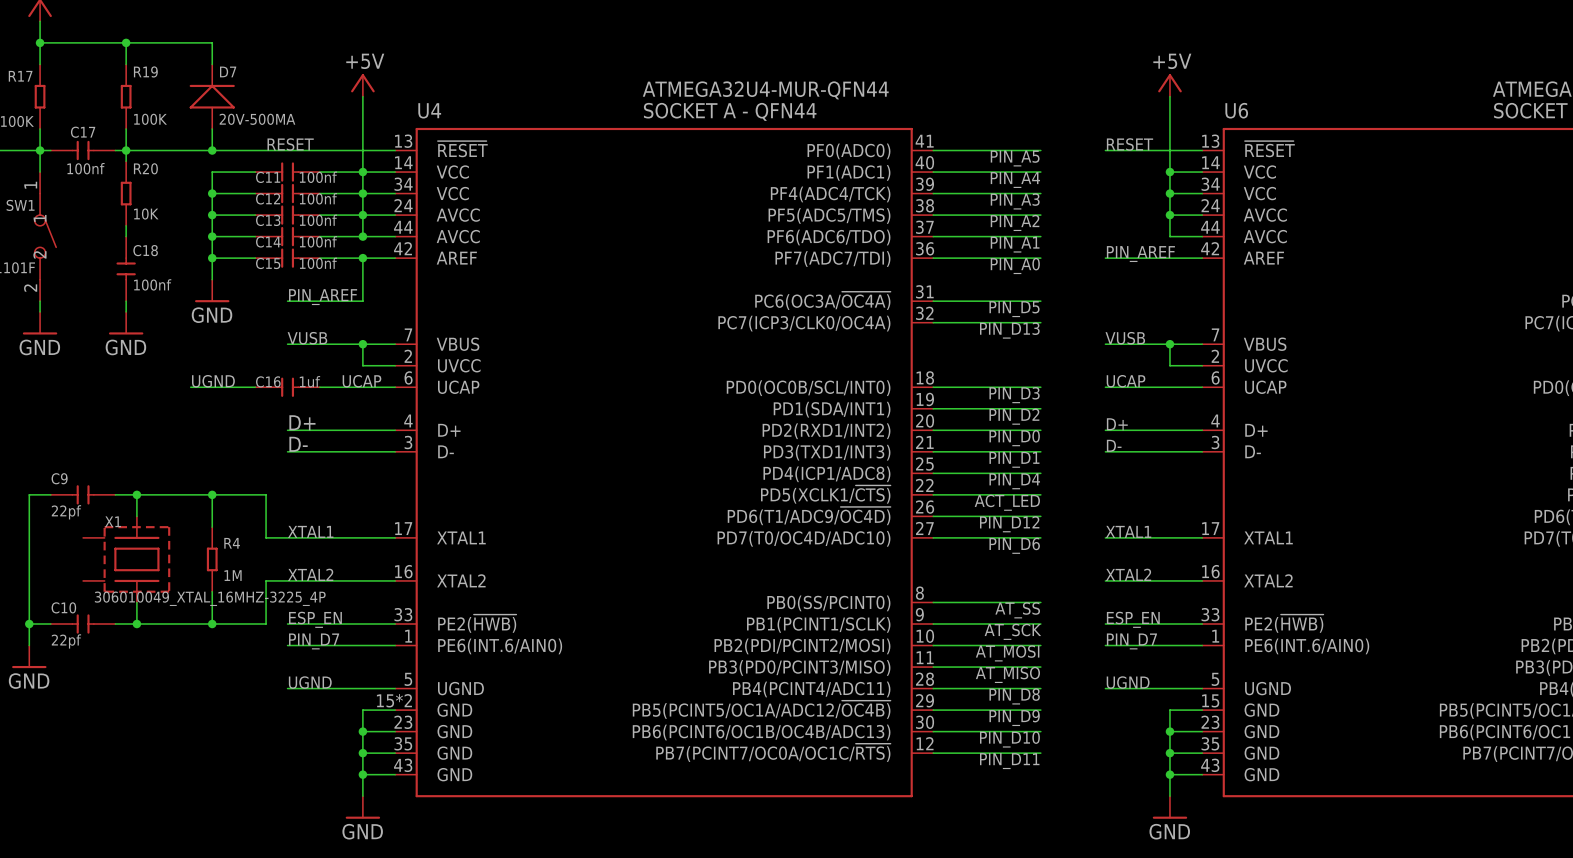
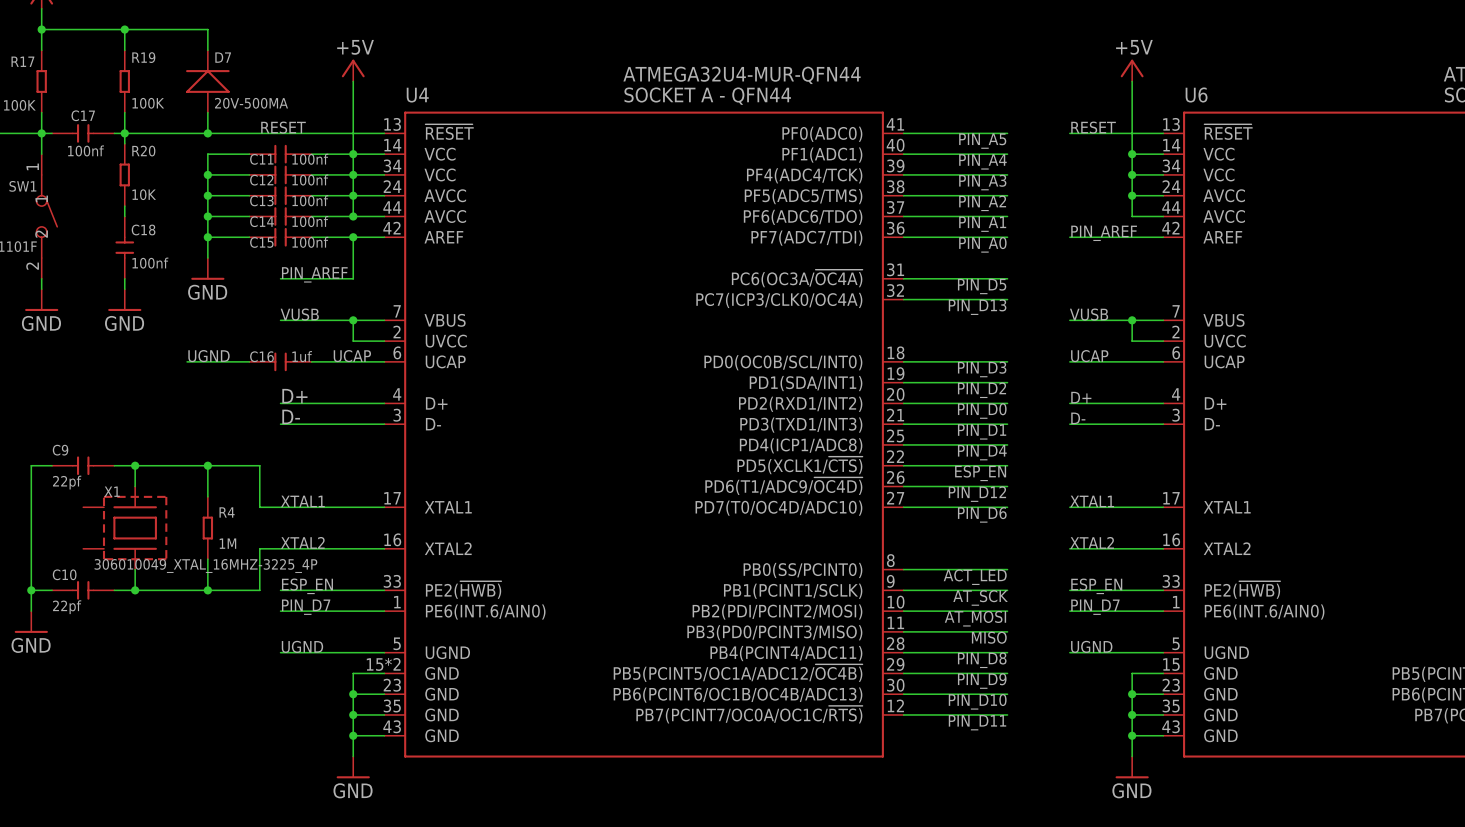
label: ACT_LED (1007, 502) -> ESP_EN (980, 473)
label: AT_SS (1017, 610) -> ACT_LED (975, 577)
label: AT_MISO (1007, 674) -> MISO (989, 637)

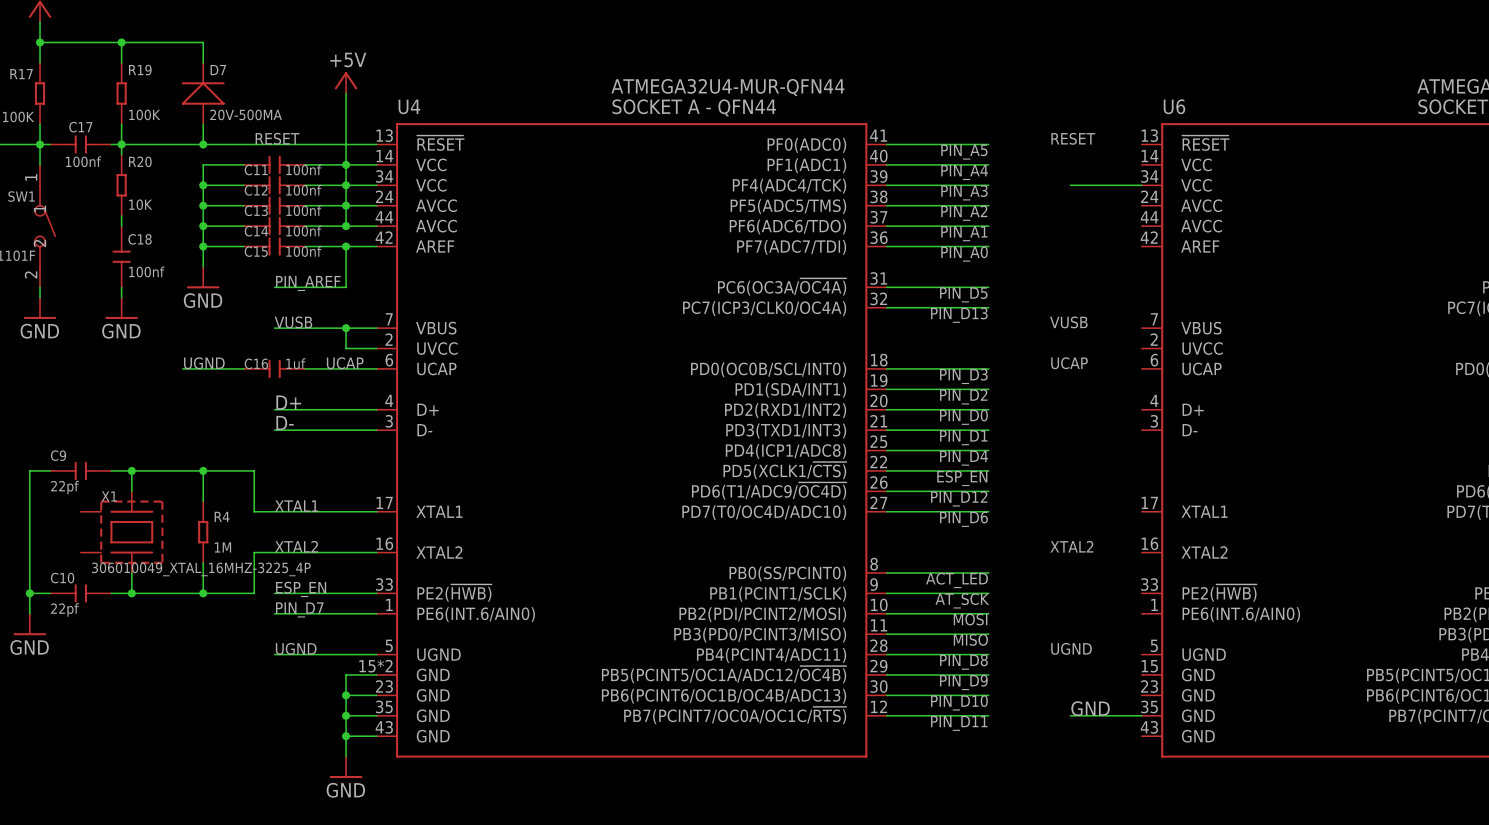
power symbol: +5V (1132, 70) -> none
wire: (1132, 81) (1132, 216) (1163, 216) -> none
wire: (1069, 133) (1163, 133) -> none
wire: (1132, 154) (1163, 154) -> none
junction: (1132, 154) -> none
wire: none -> (1070, 185) (1111, 185)
junction: (1132, 174) -> none
wire: (1132, 195) (1163, 195) -> none
junction: (1132, 195) -> none
label: PIN_AREF (1104, 233) -> none
wire: (1069, 237) (1163, 237) -> none
wire: (1069, 320) (1163, 320) -> none
wire: (1132, 320) (1132, 341) (1163, 341) -> none
junction: (1132, 320) -> none
wire: (1069, 361) (1163, 361) -> none
label: D+ (1081, 397) -> none
wire: (1069, 403) (1163, 403) -> none
label: D- (1078, 418) -> none
wire: (1069, 424) (1163, 424) -> none
label: XTAL1 (1092, 501) -> none
wire: (1069, 507) (1163, 507) -> none
wire: (1069, 548) (1163, 548) -> none
label: ESP_EN (1096, 586) -> none
wire: (1069, 590) (1163, 590) -> none
label: PIN_D7 (1095, 607) -> none
wire: (1069, 611) (1163, 611) -> none
label: AT_MOSI (975, 618) -> MOSI (970, 619)
wire: (1069, 652) (1163, 652) -> none
wire: (1163, 673) (1132, 673) (1132, 756) -> none
wire: (1132, 694) (1163, 694) -> none
junction: (1132, 694) -> none
label: none -> GND (1090, 708)
wire: none -> (1070, 715) (1111, 715)
junction: (1132, 714) -> none
wire: (1132, 735) (1163, 735) -> none
junction: (1132, 735) -> none
power symbol: GND (1132, 767) -> none

